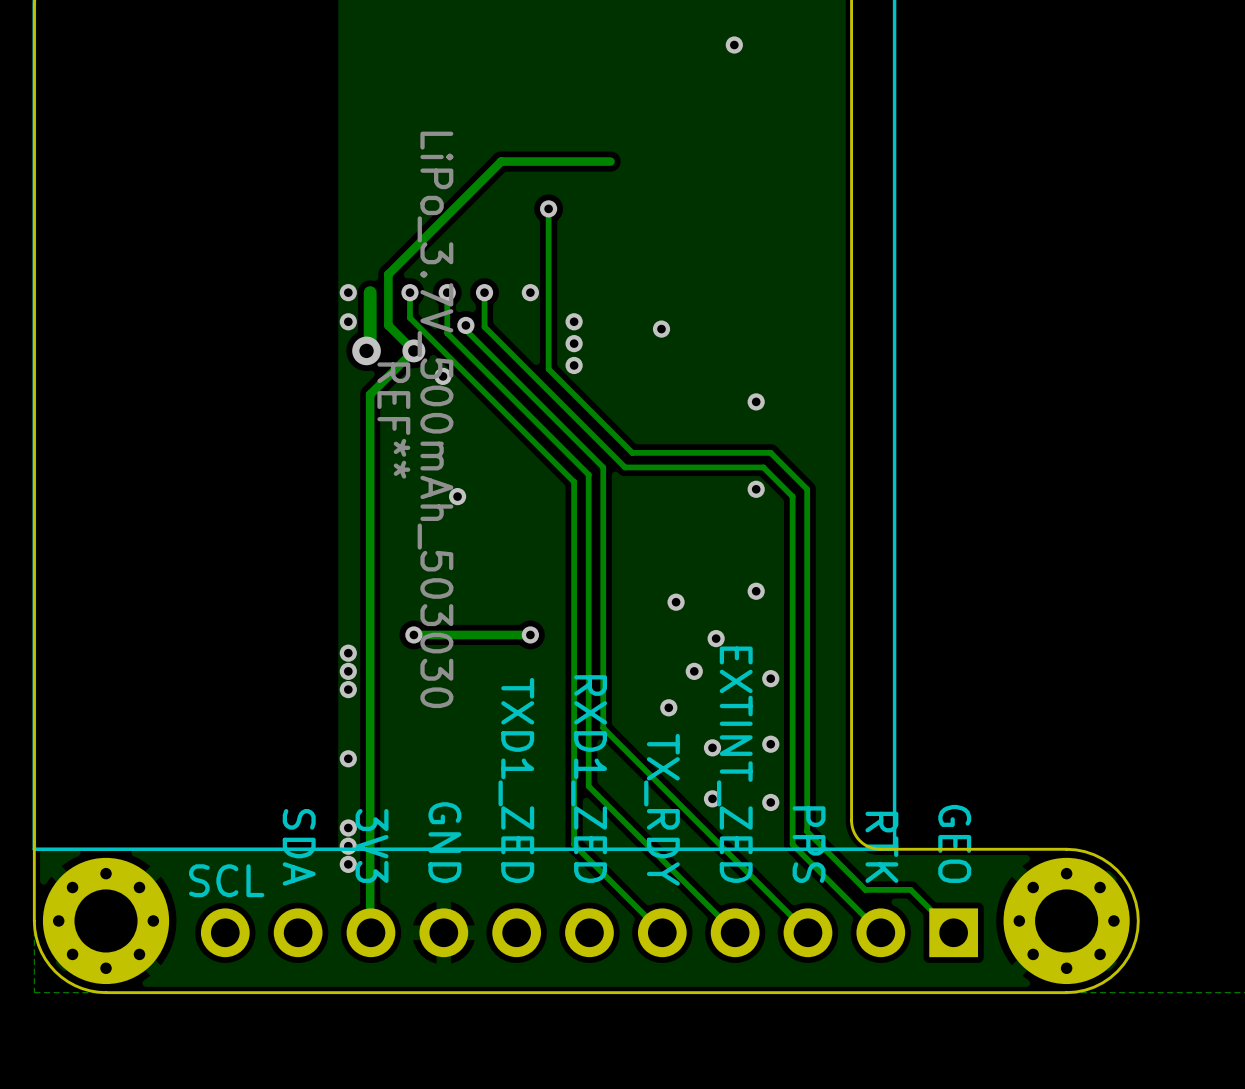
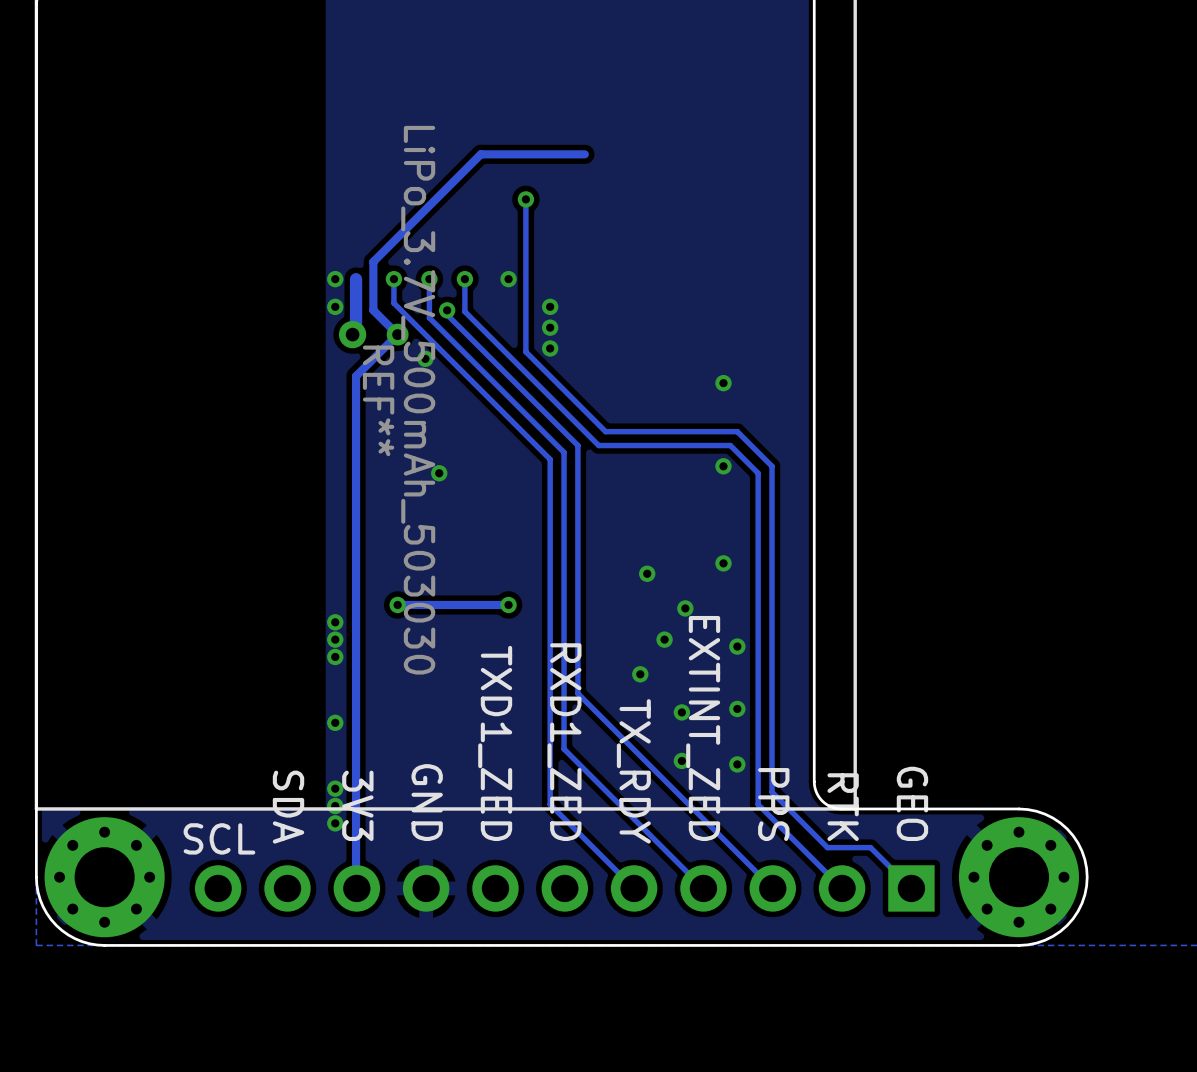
via: (734, 45) -> none
via: (661, 329) -> none

